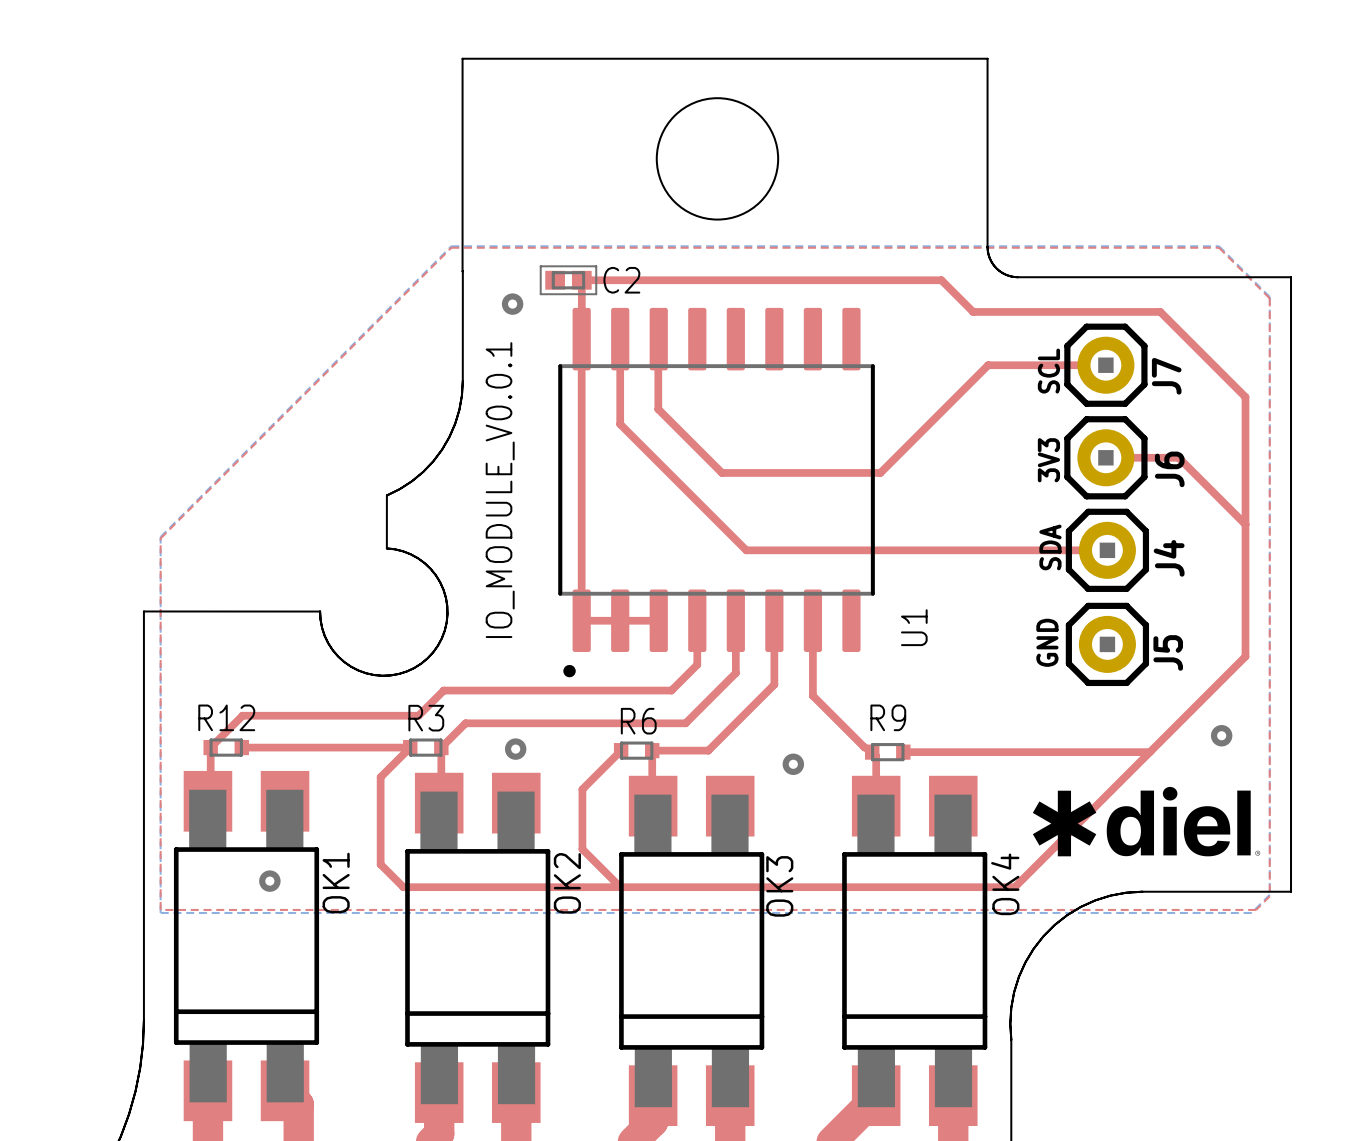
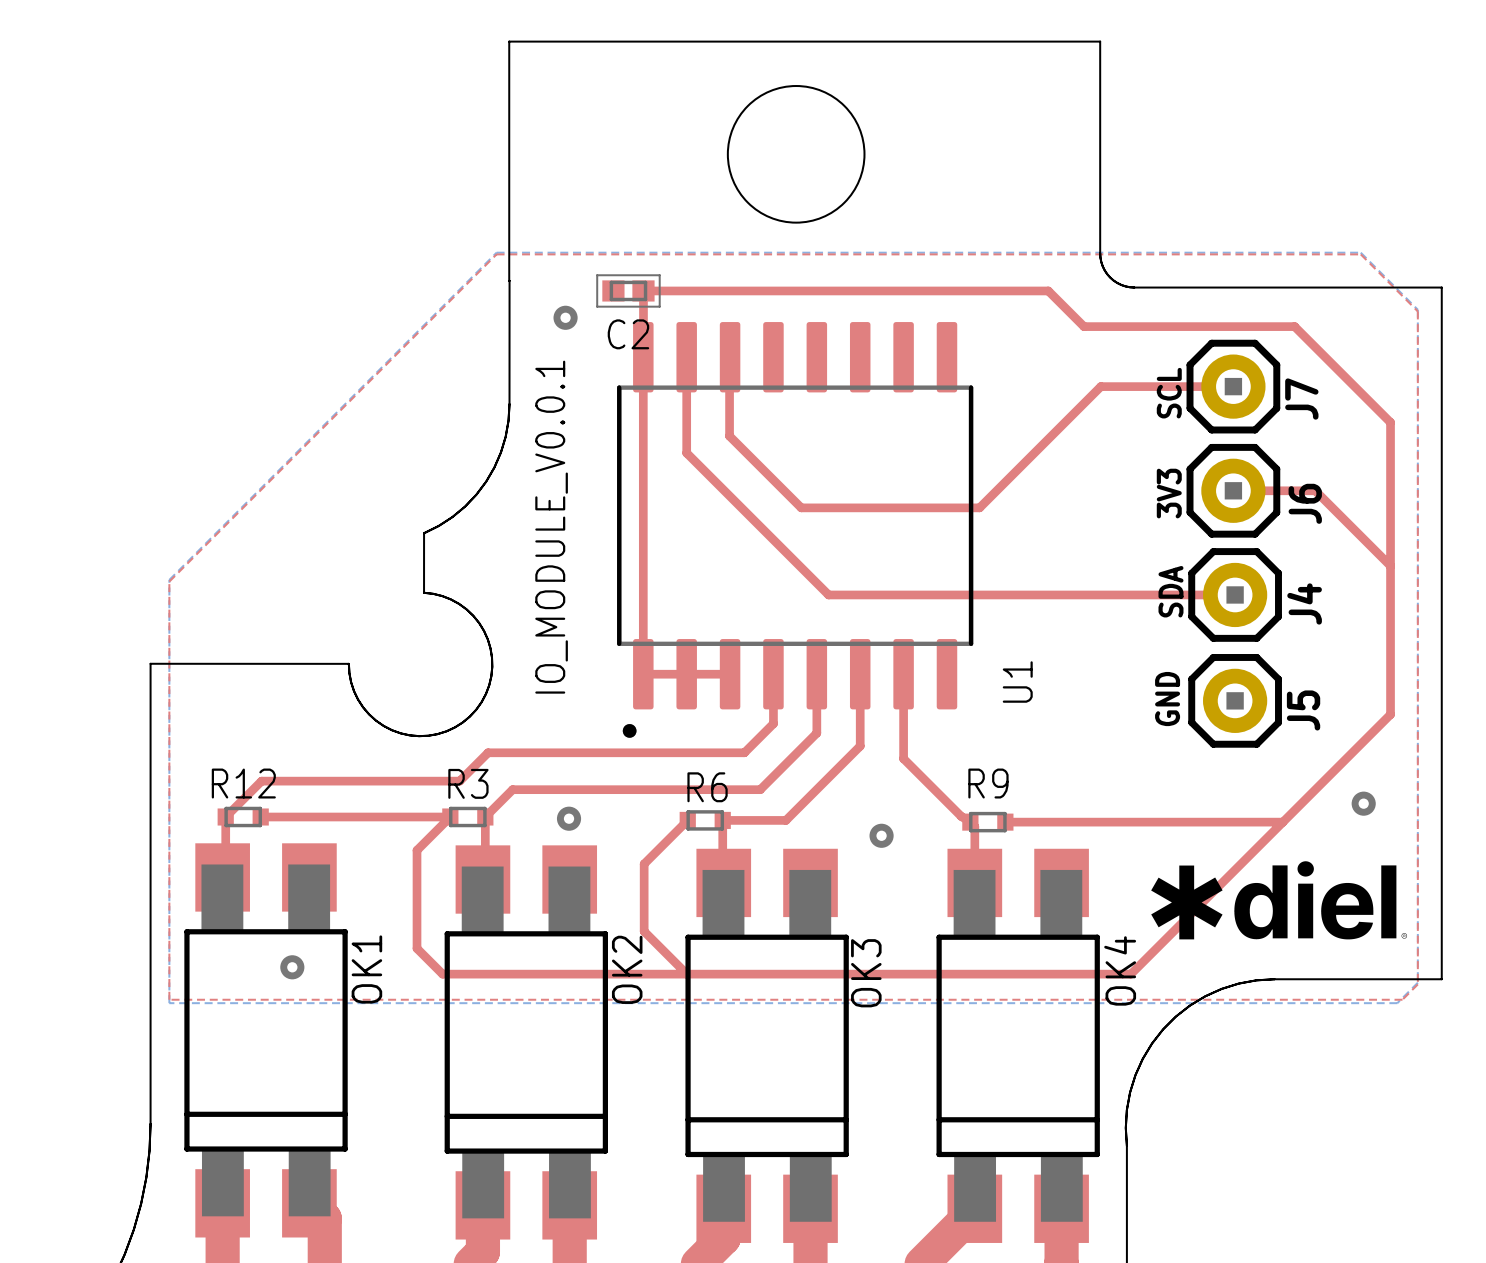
C2 name position: C2 (621, 280) -> C2 (628, 334)

